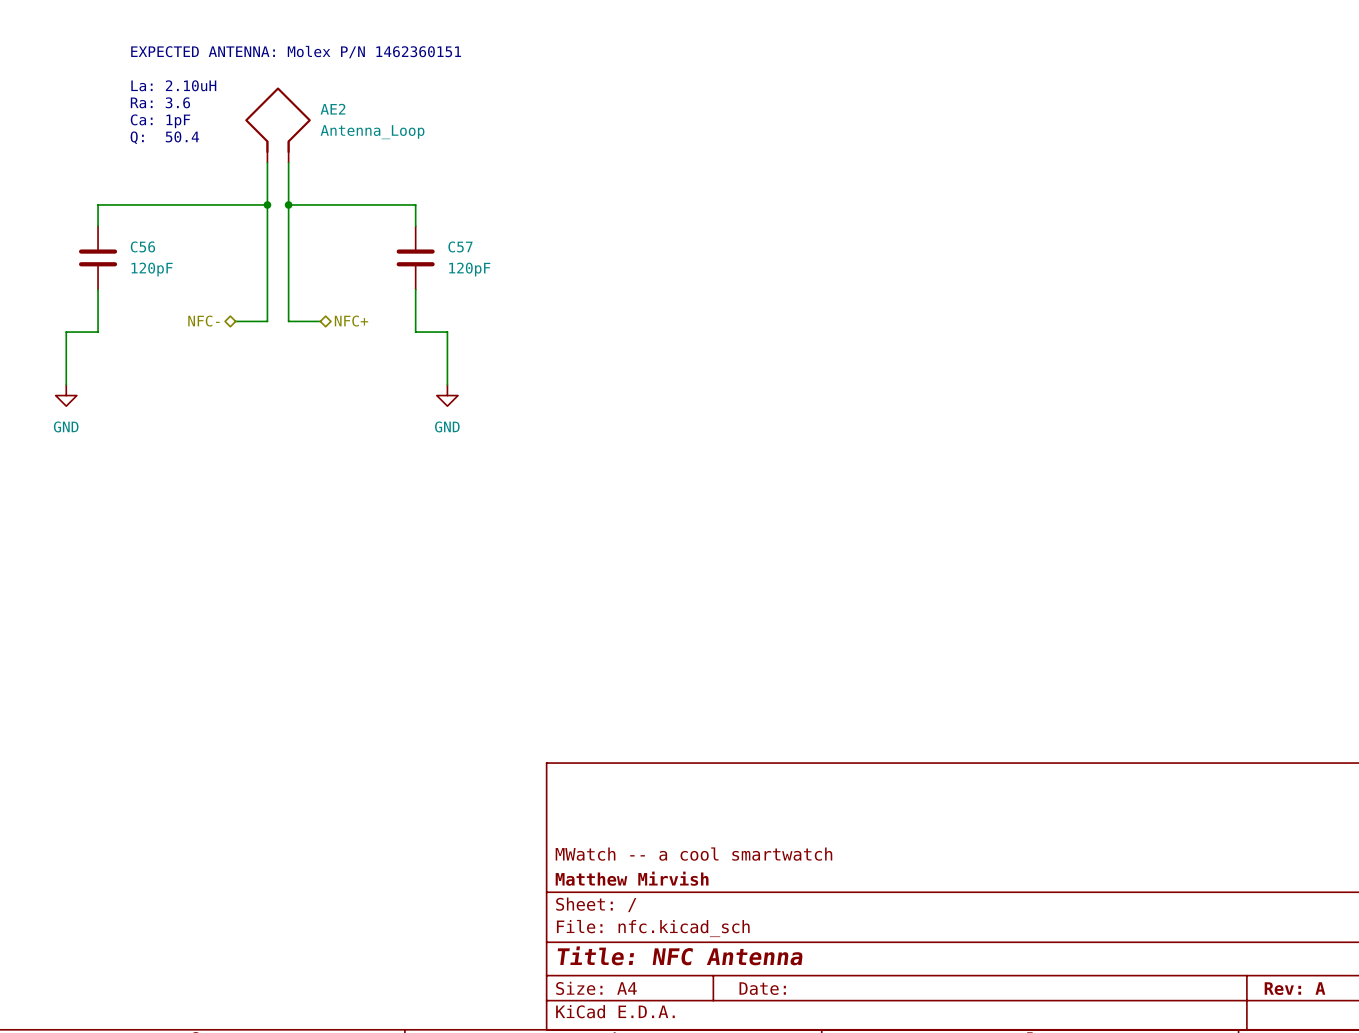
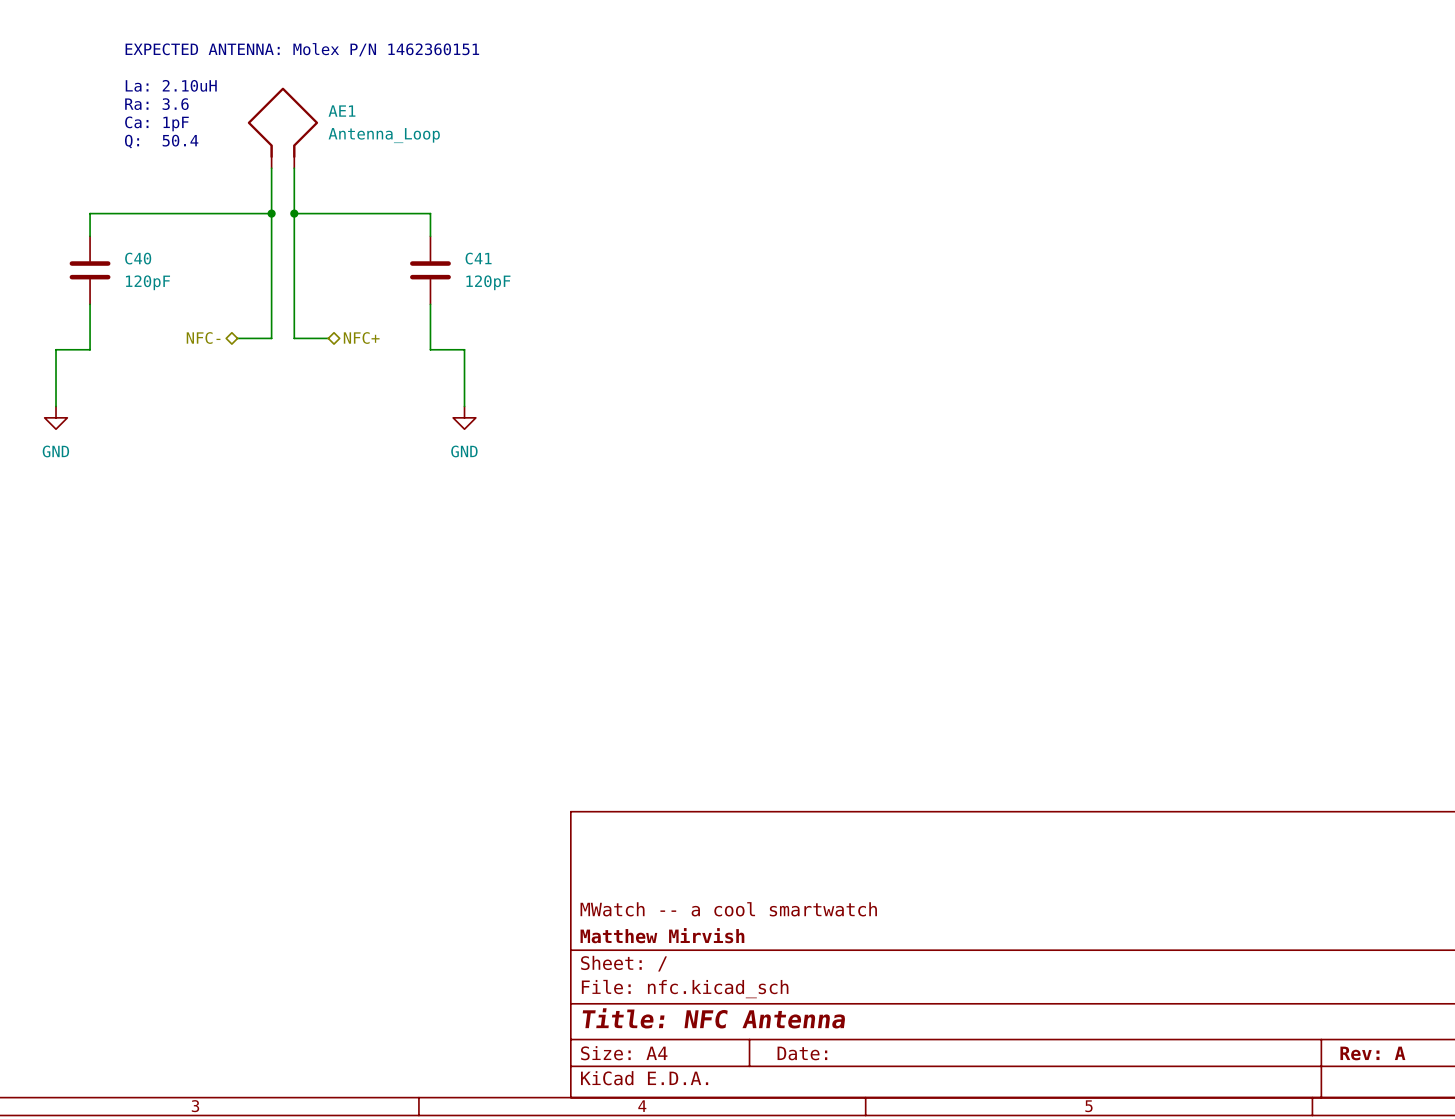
AE2 name: AE2 (333, 109) -> AE1 (342, 111)
C56 name: C56 (142, 246) -> C40 (138, 258)
C57 name: C57 (460, 246) -> C41 (478, 258)

